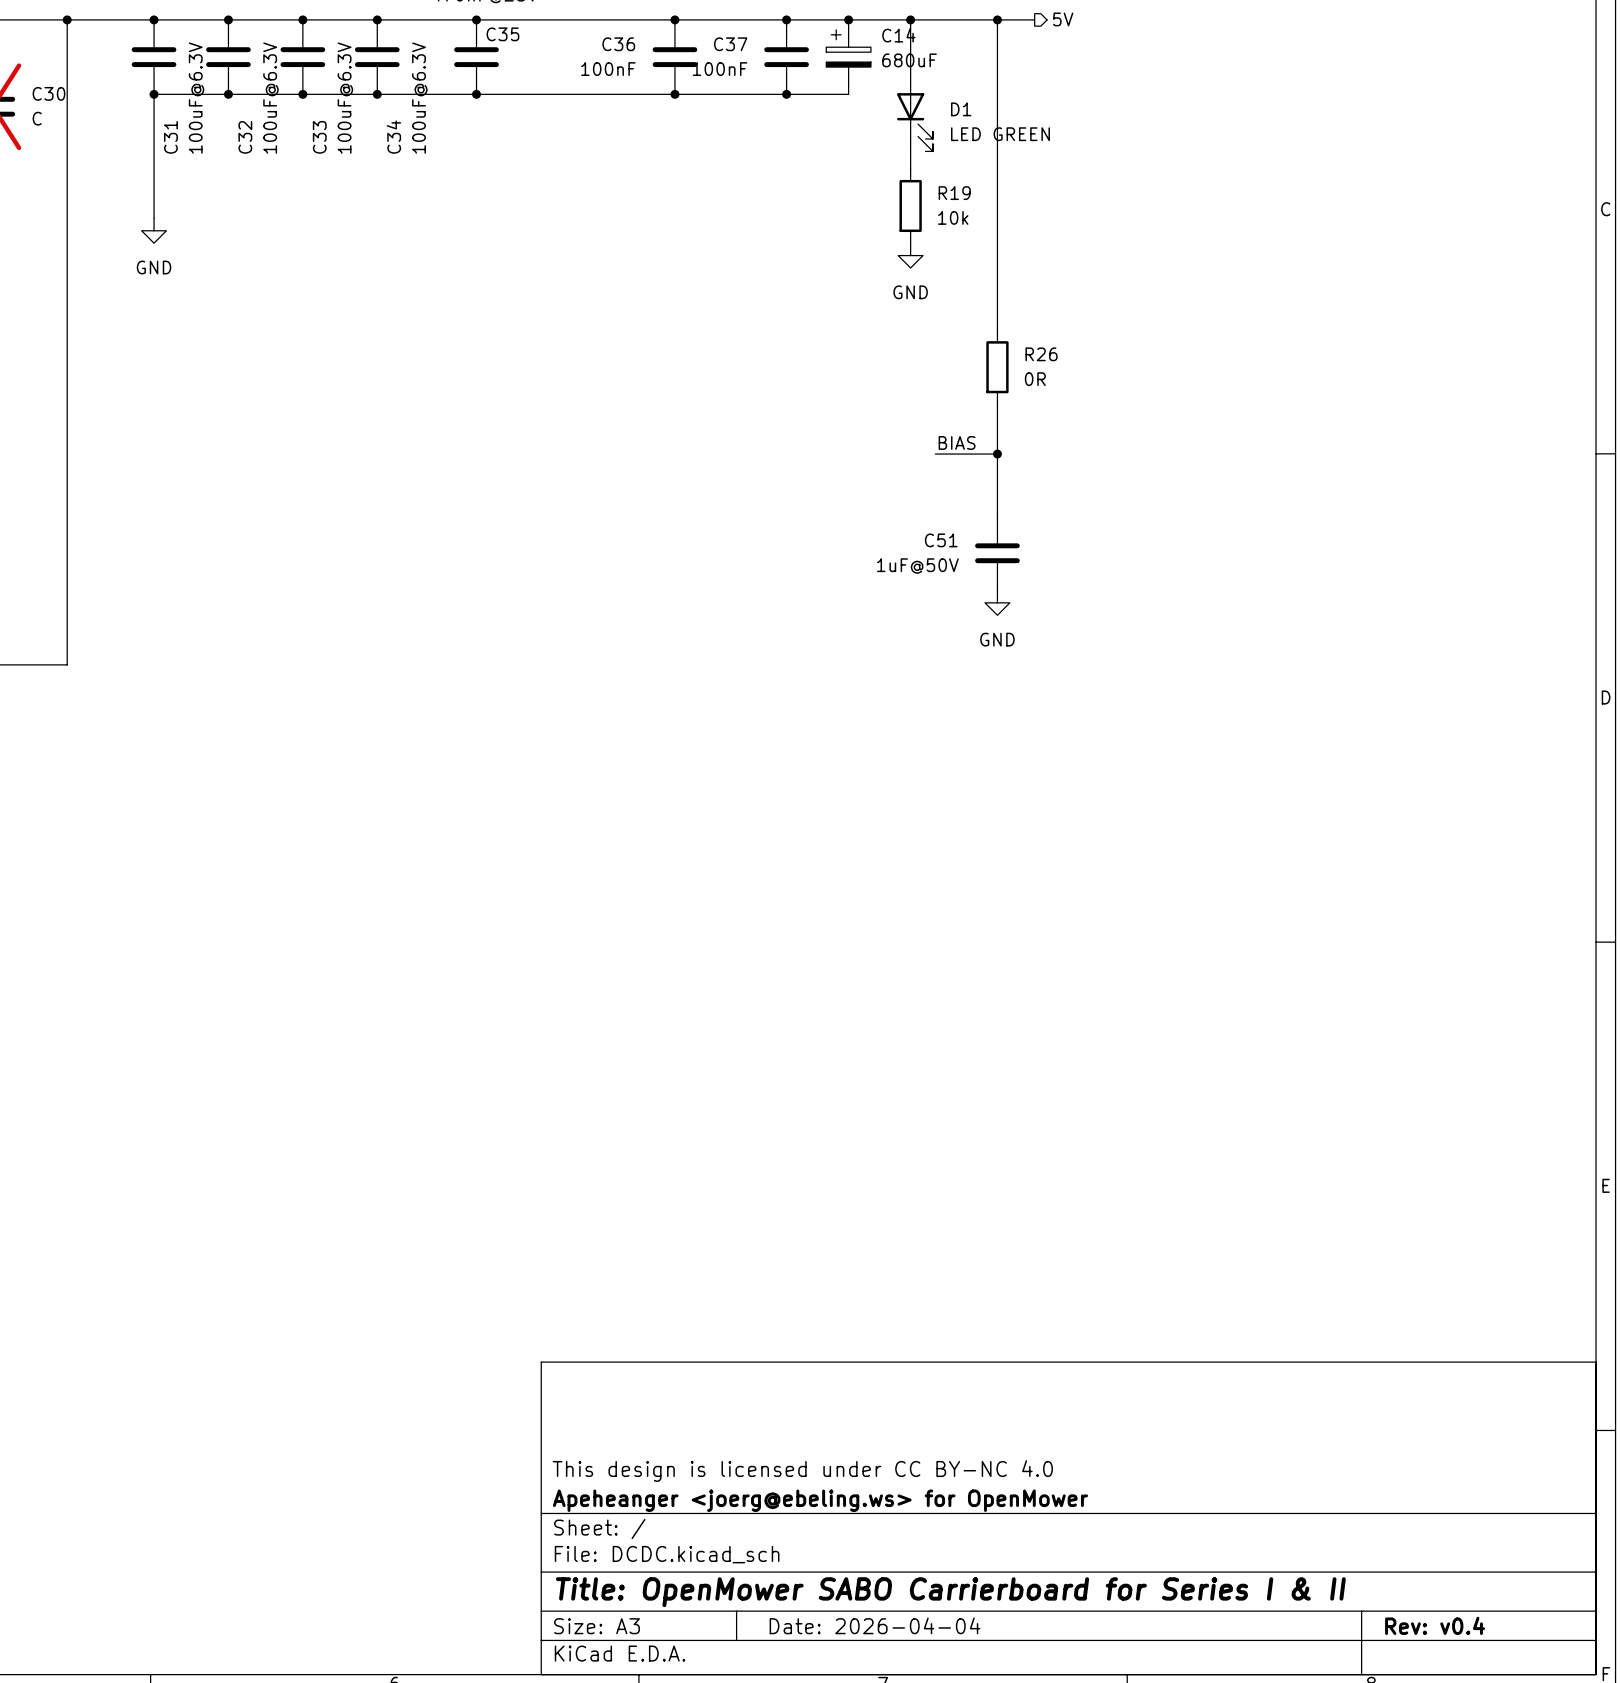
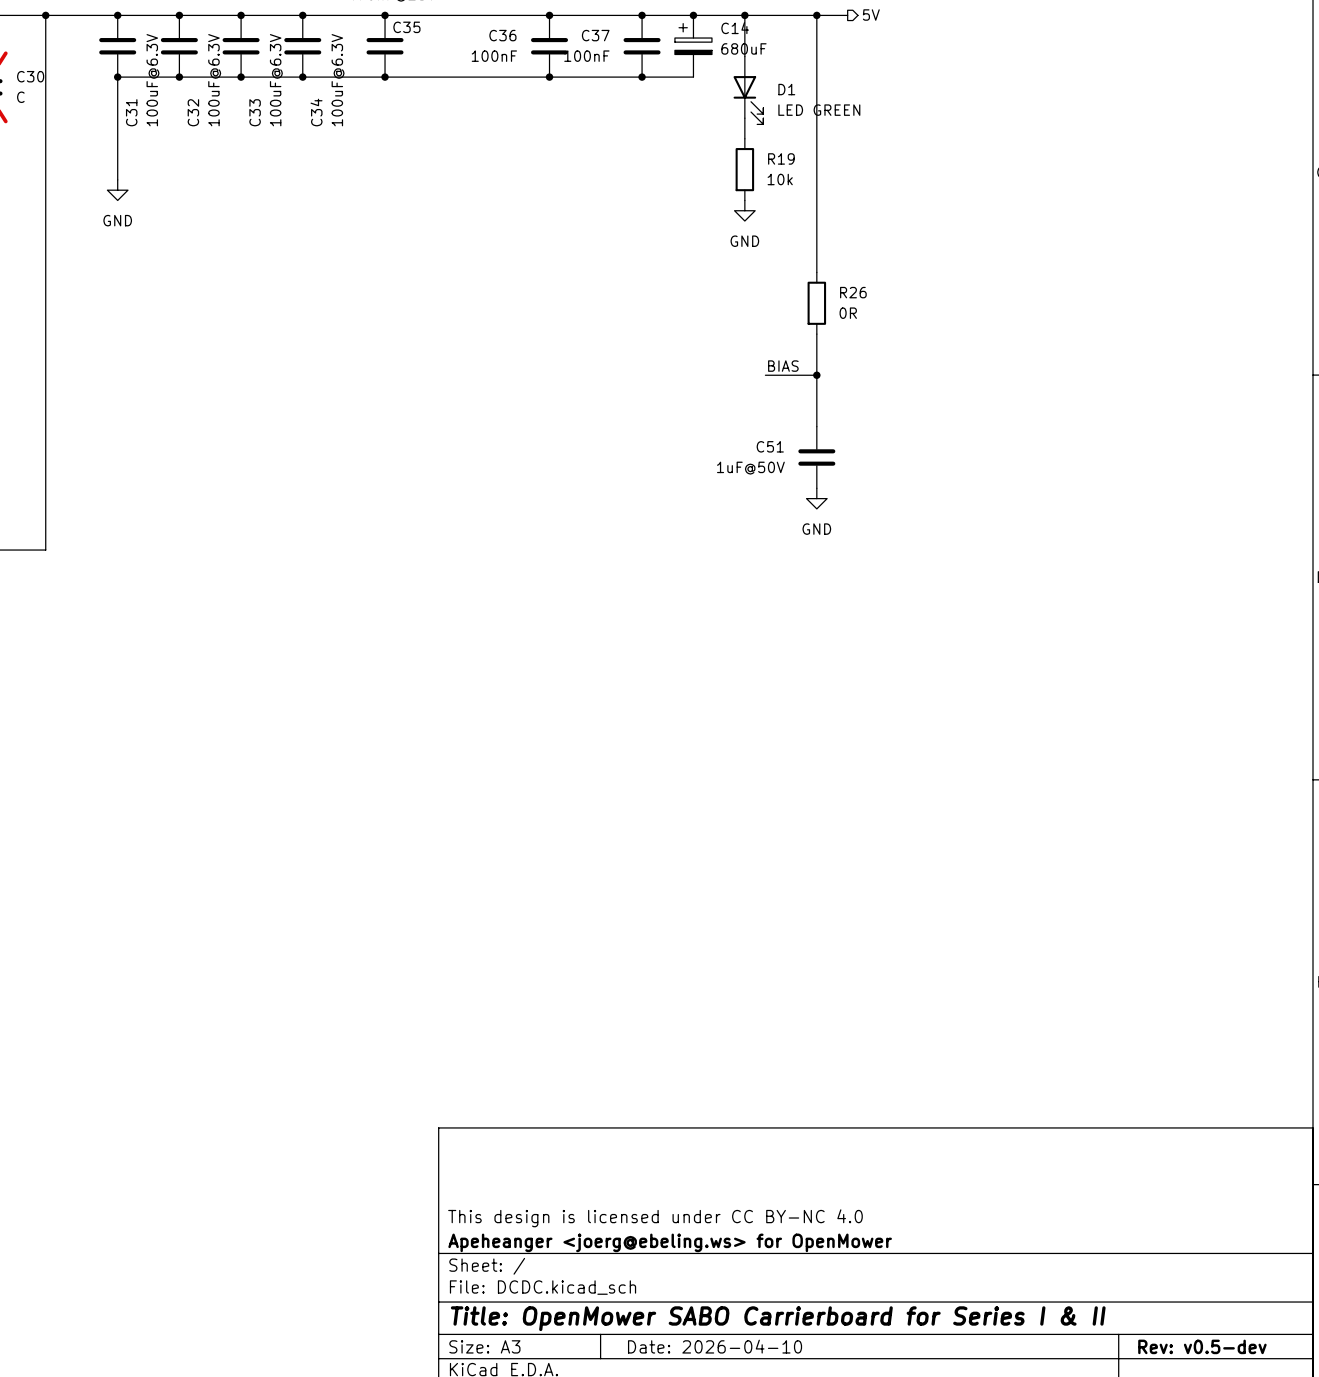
title block: Date: 2026-04-04 (874, 1625) -> Date: 2026-04-10 (715, 1346)
title block: Rev: v0.4 (1435, 1625) -> Rev: v0.5-dev (1202, 1346)

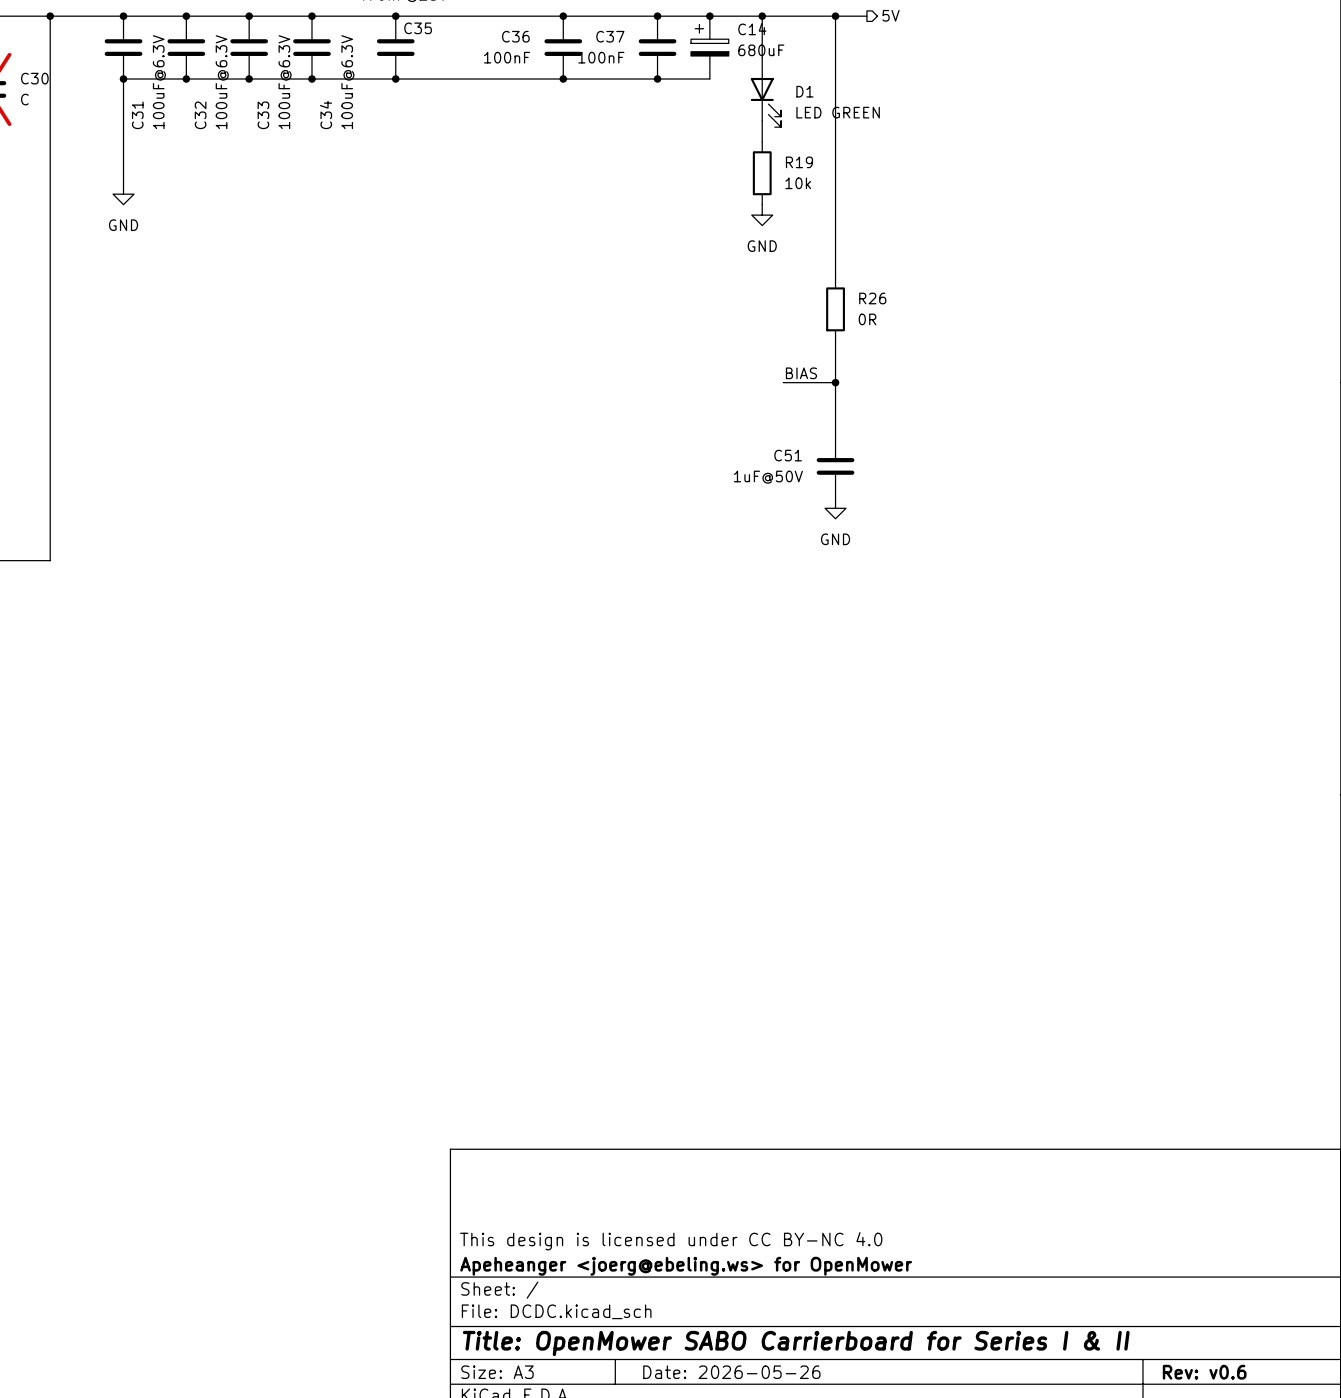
title block: Date: 2026-04-10 (715, 1346) -> Date: 2026-05-26 (731, 1372)
title block: Rev: v0.5-dev (1202, 1346) -> Rev: v0.6 (1204, 1372)

